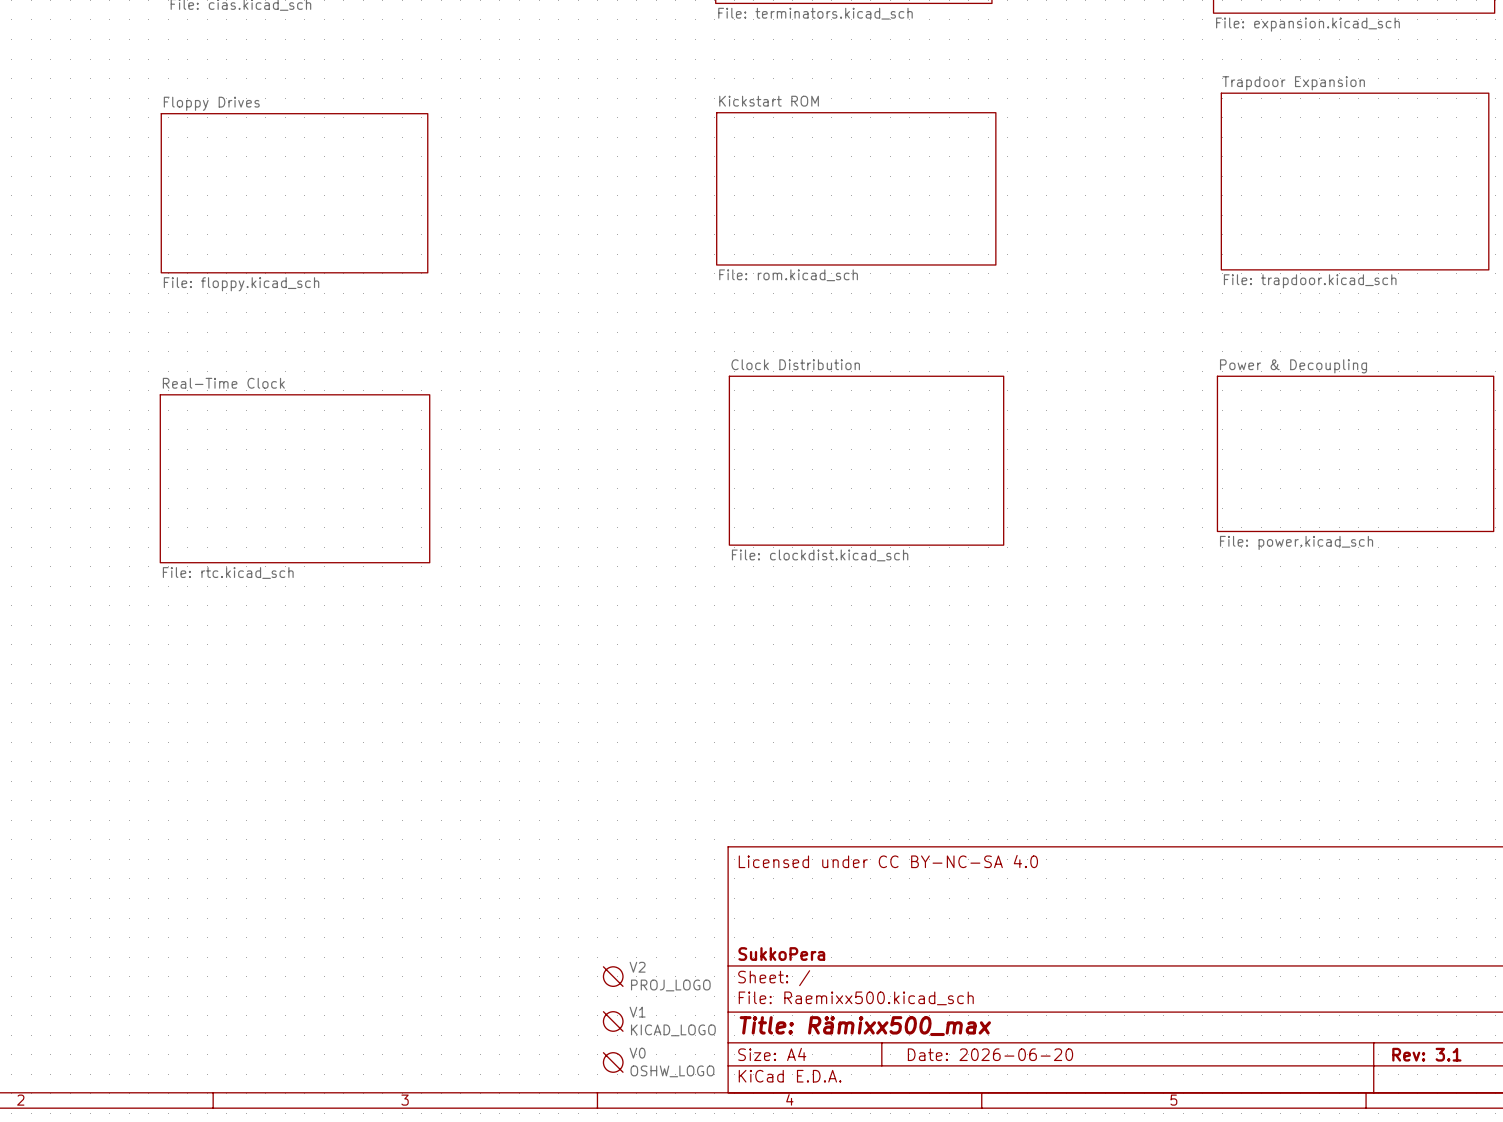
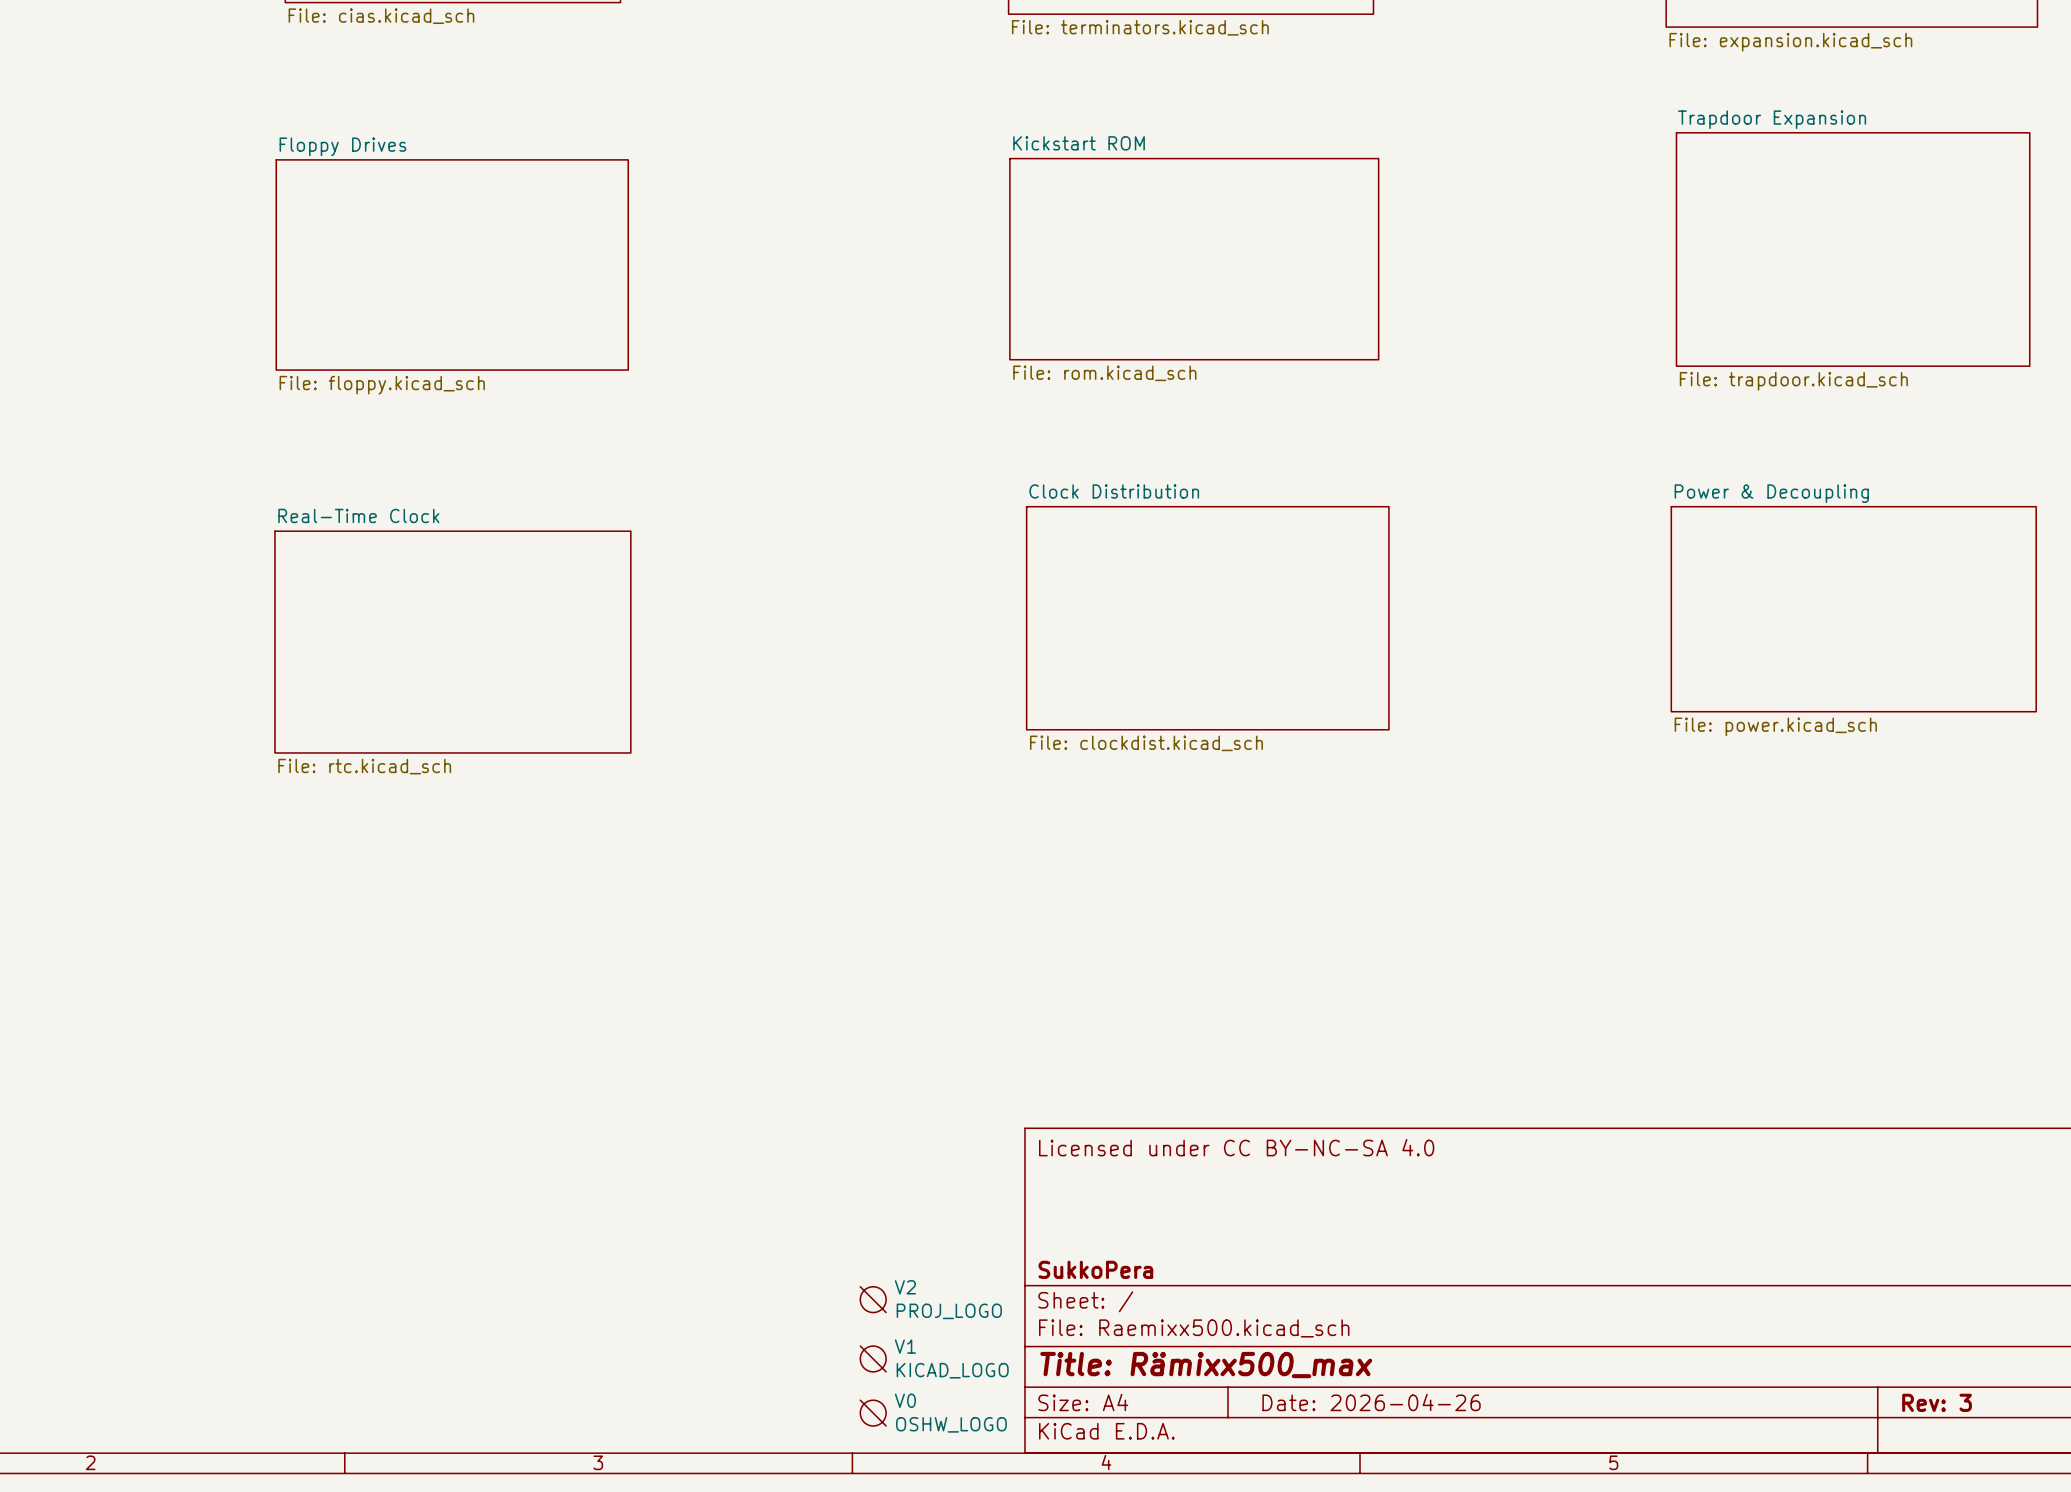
title block: Date: 2026-06-20 (990, 1054) -> Date: 2026-04-26 (1371, 1402)
title block: Rev: 3.1 (1426, 1054) -> Rev: 3 (1937, 1402)

